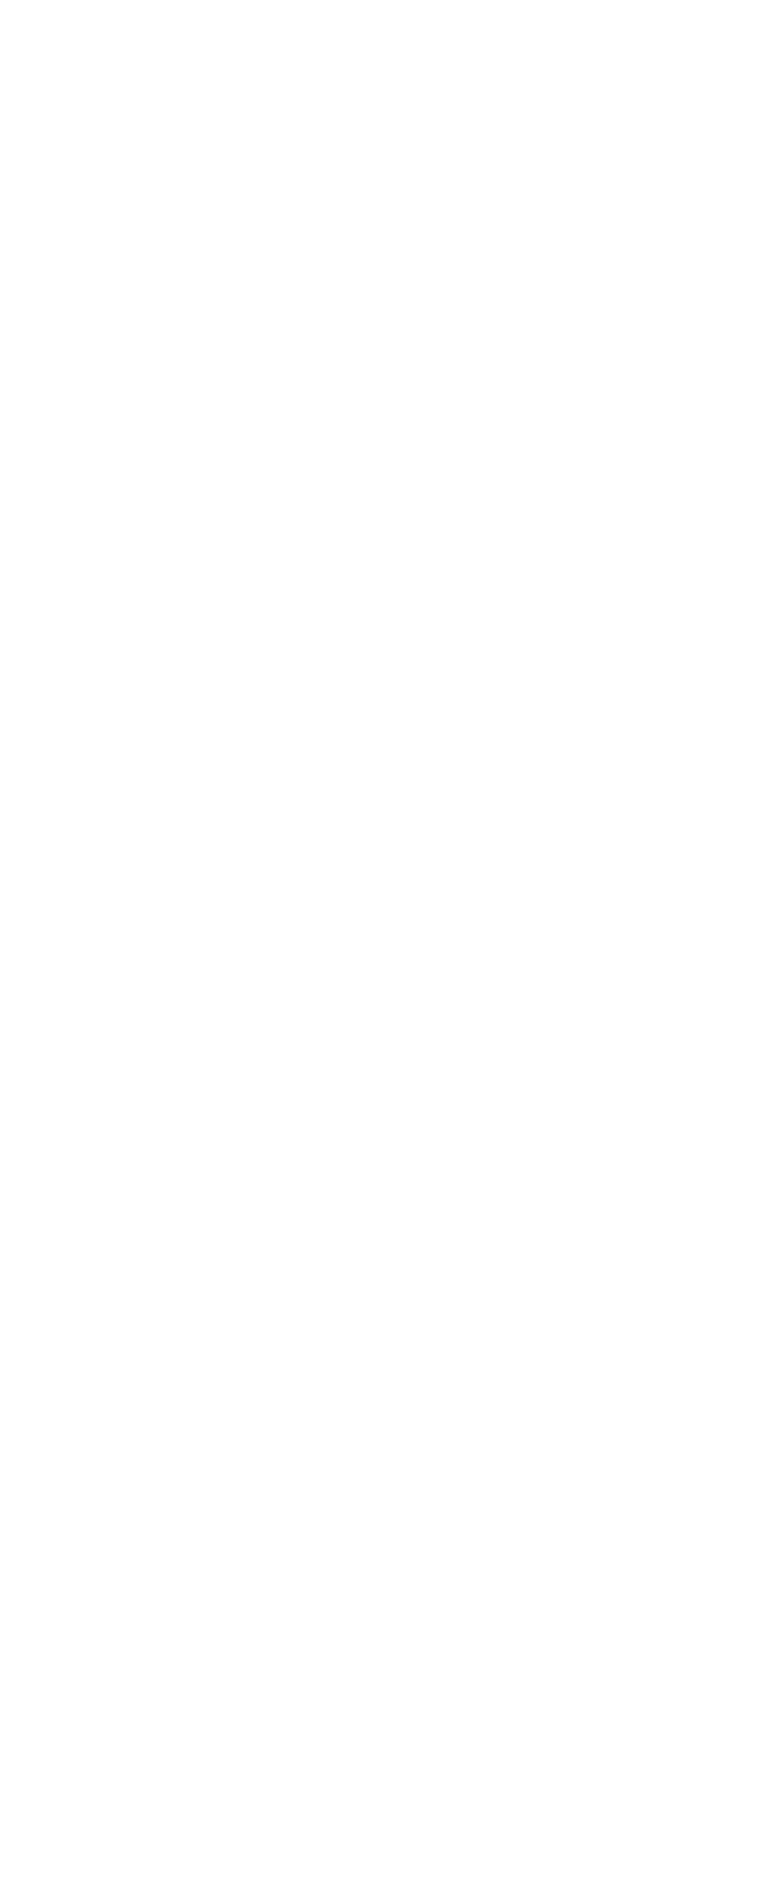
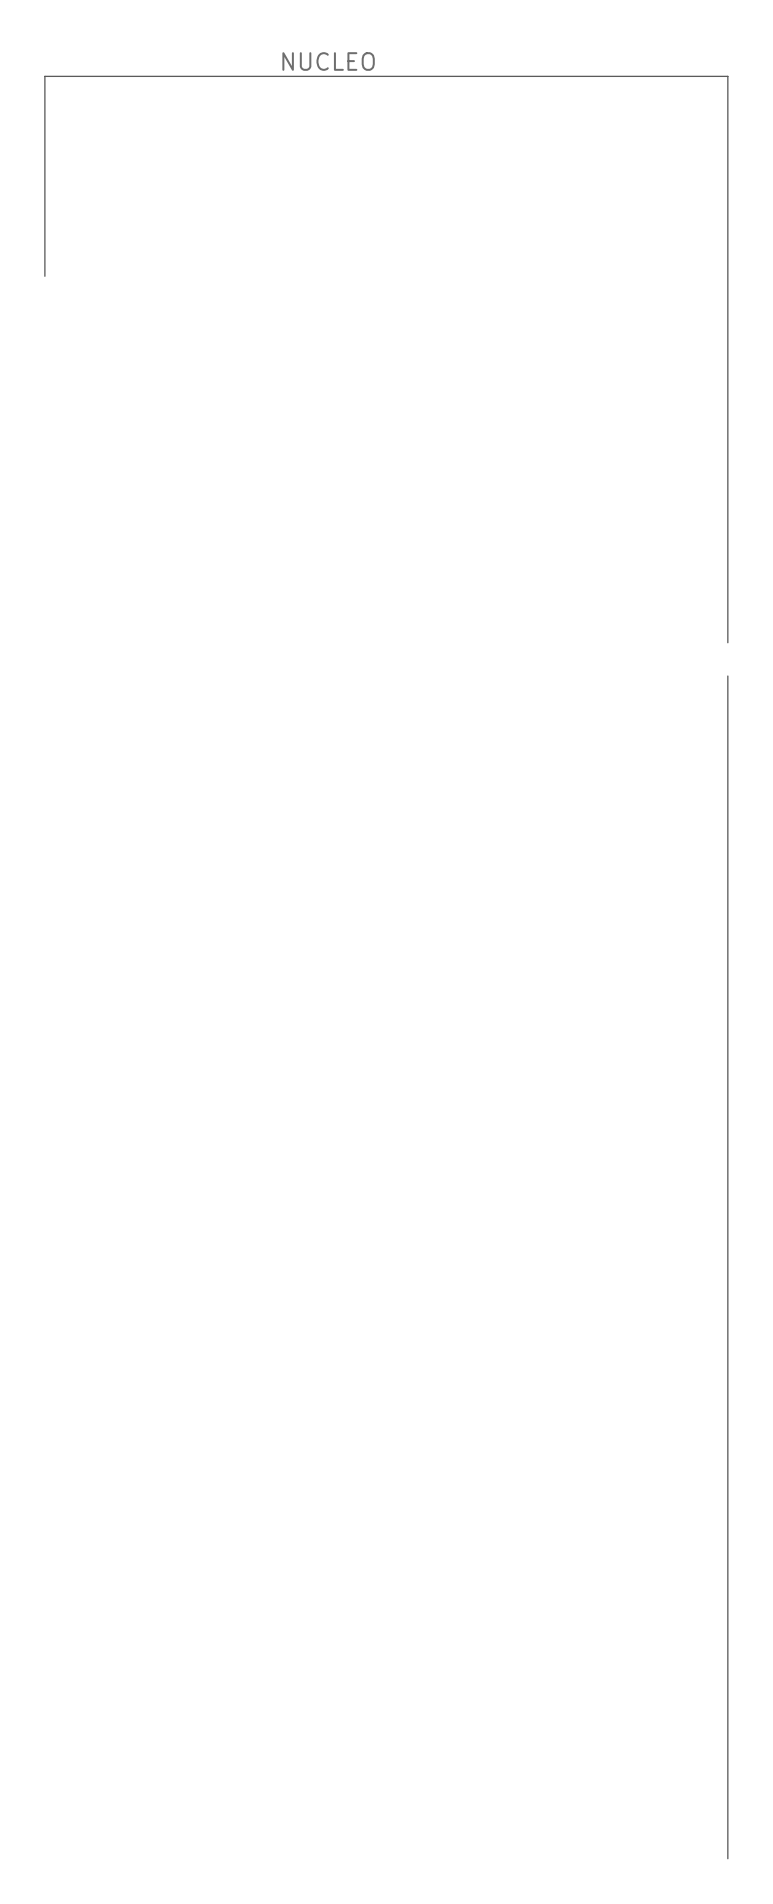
label: none -> NUCLEO (328, 61)
bus: none -> (44, 276) (44, 76) (727, 76) (727, 642)
bus: none -> (727, 676) (727, 1858)

